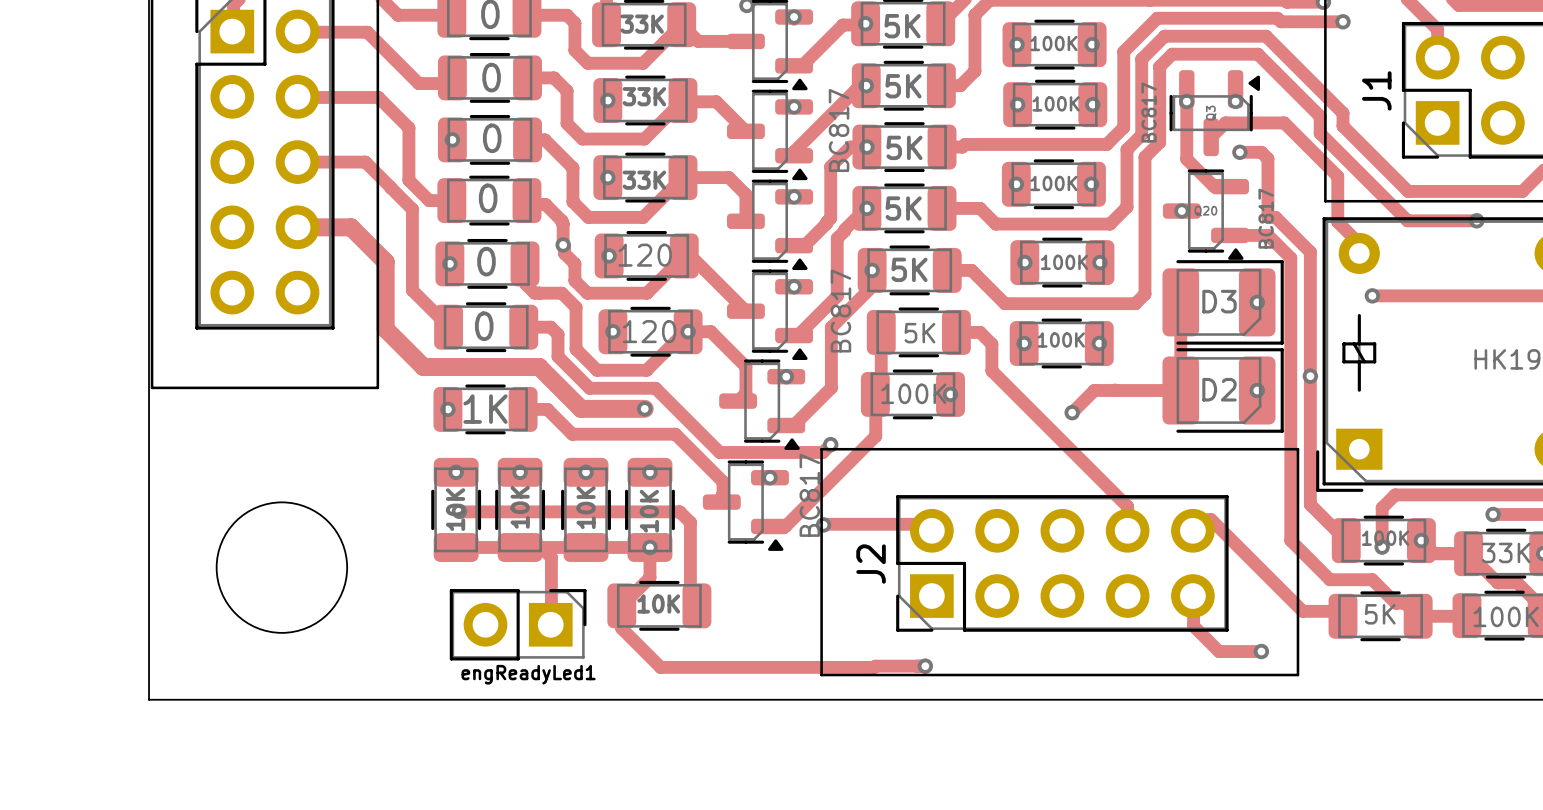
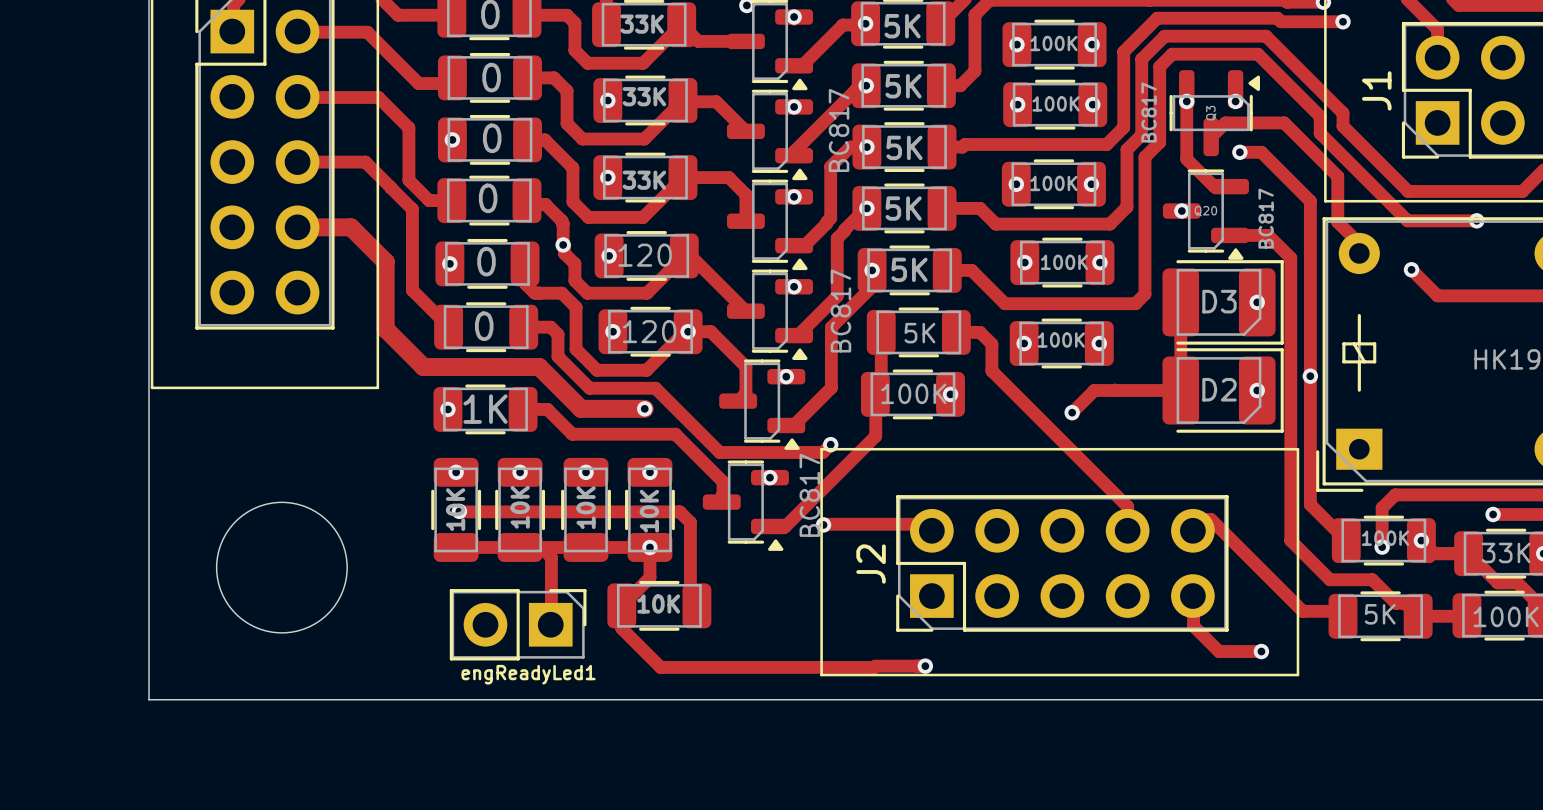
track: (1267, 158) (1267, 217) (1275, 217) (1310, 252) -> (1267, 158) (1310, 201) (1310, 252)
track: (1372, 295) (1437, 295) -> (1411, 269) (1437, 295)
via position: (1372, 295) -> (1411, 269)

